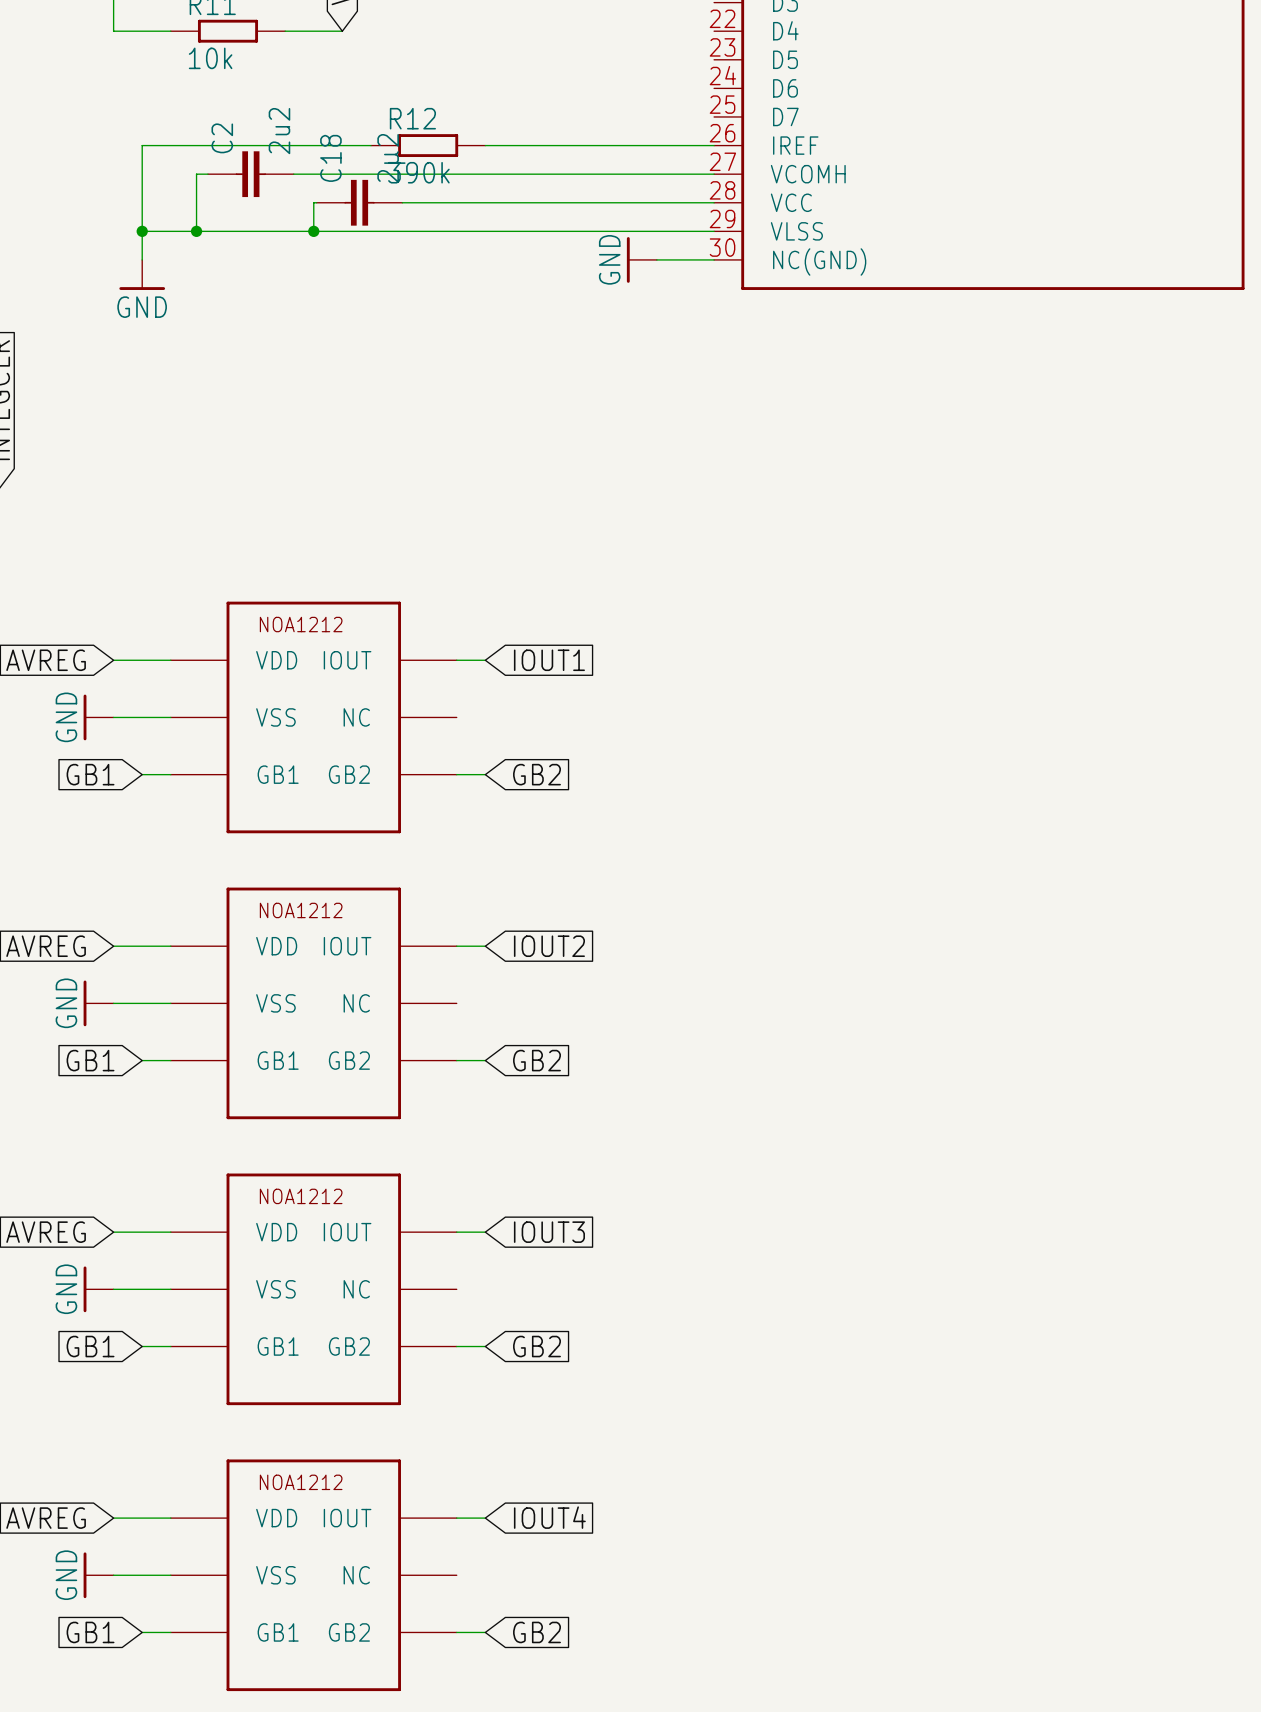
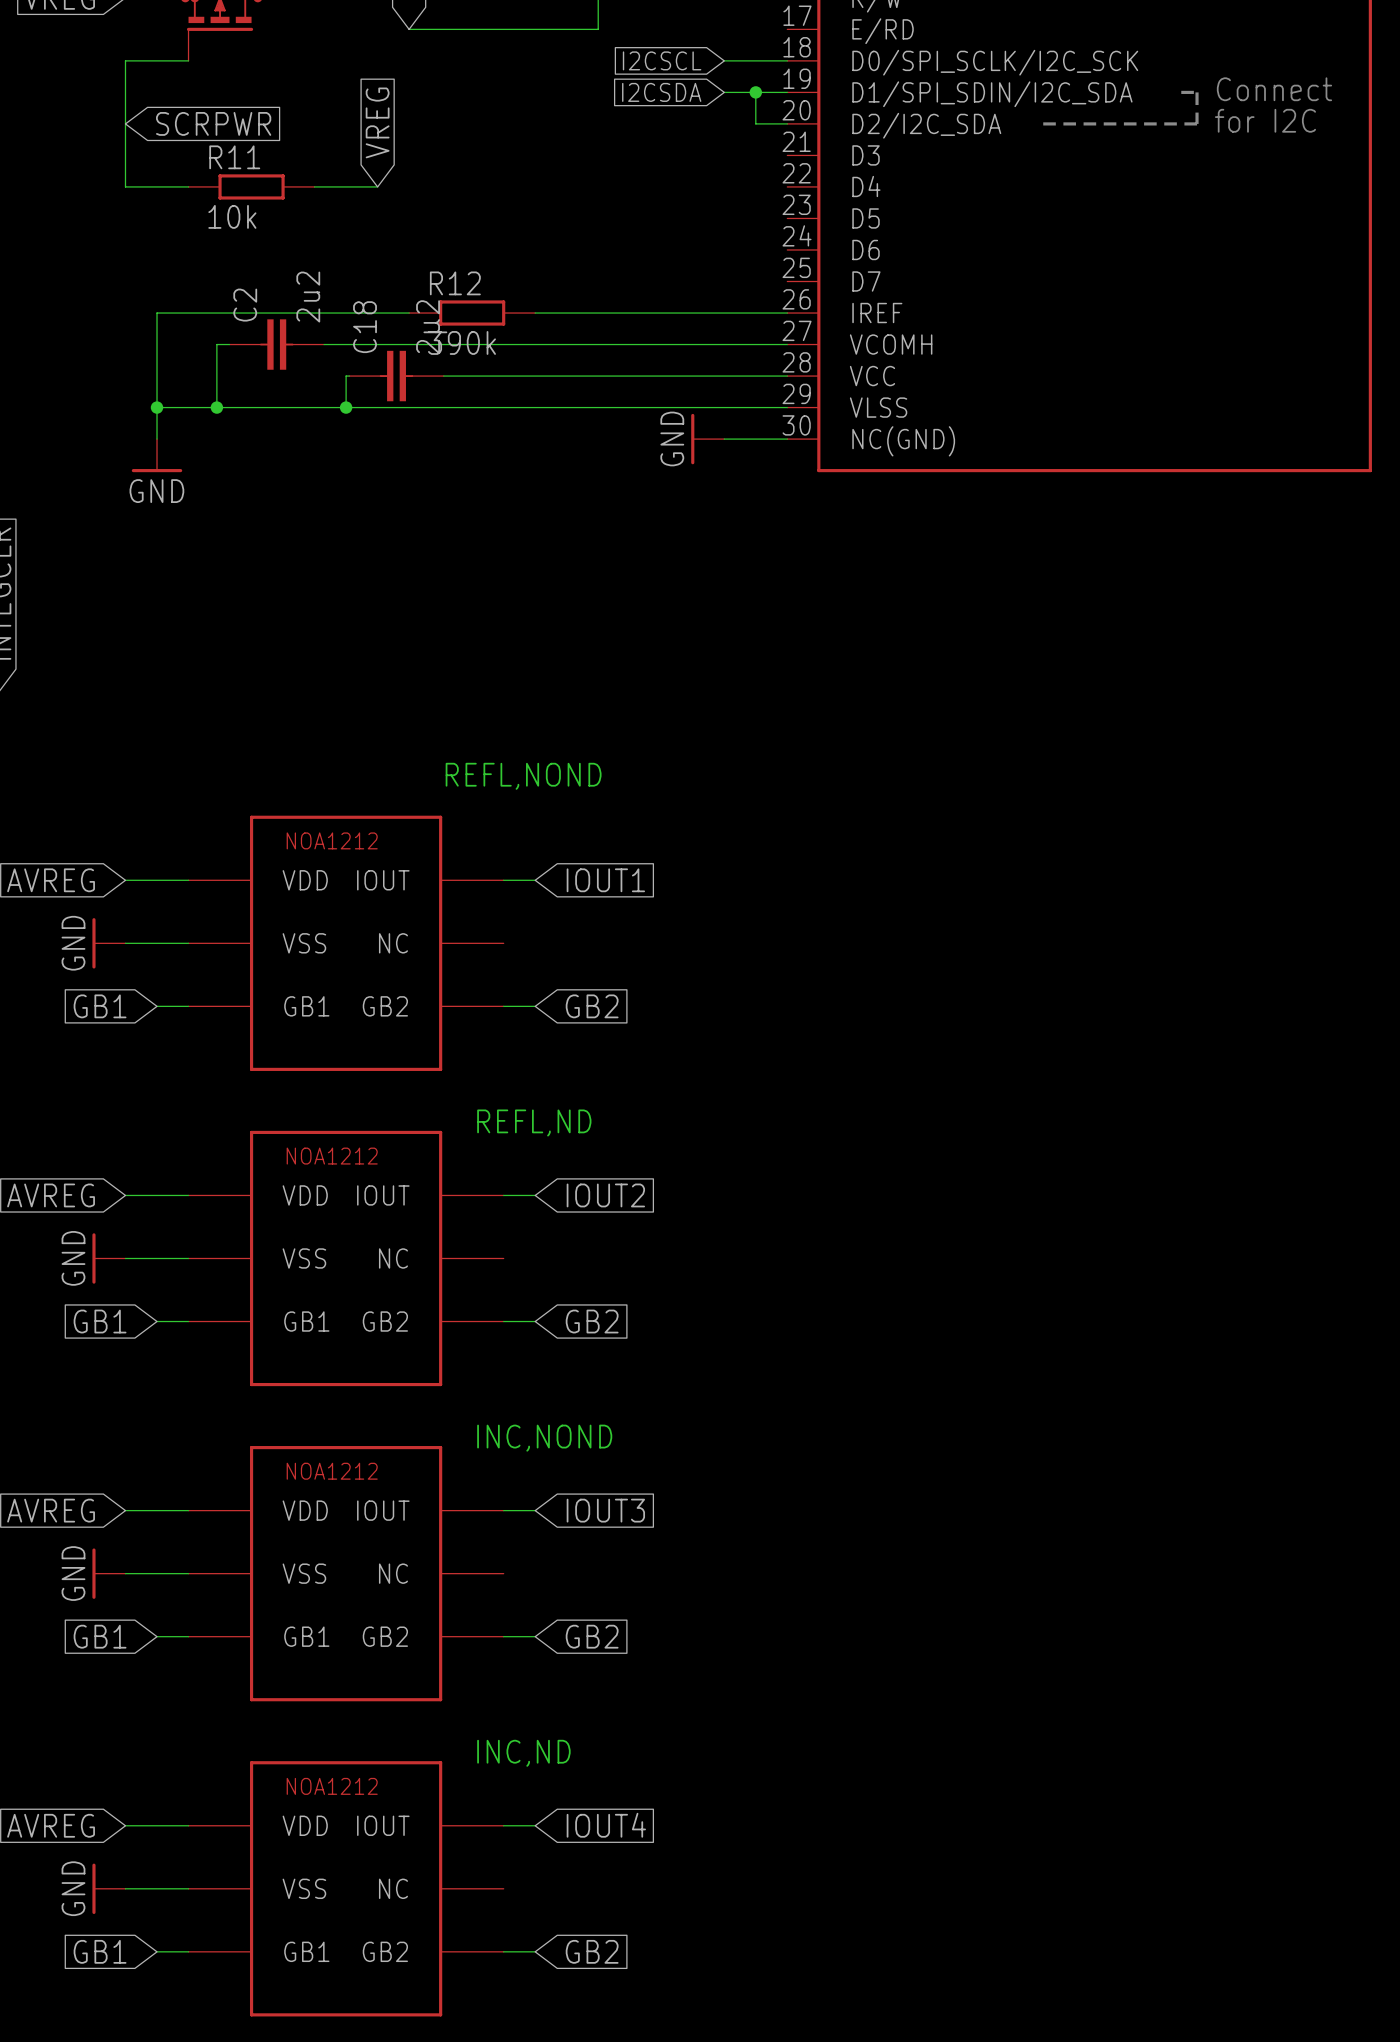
text: none -> REFL,NOND (523, 776)
text: none -> REFL,ND (534, 1122)
text: none -> INC,NOND (544, 1438)
text: none -> INC,ND (523, 1753)

